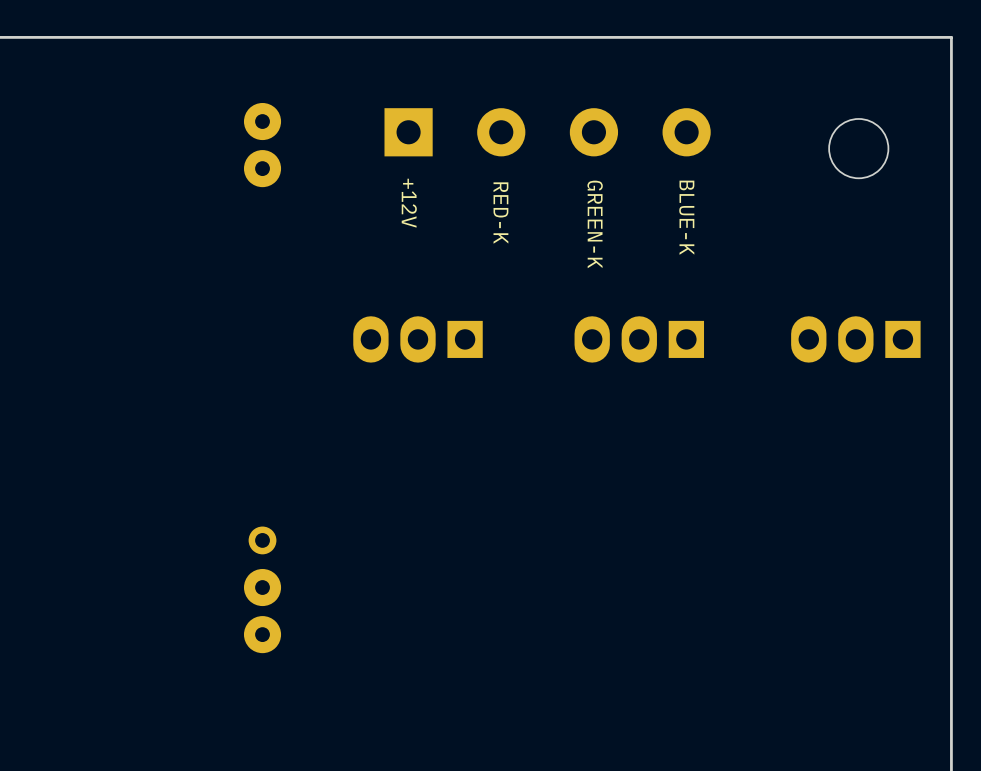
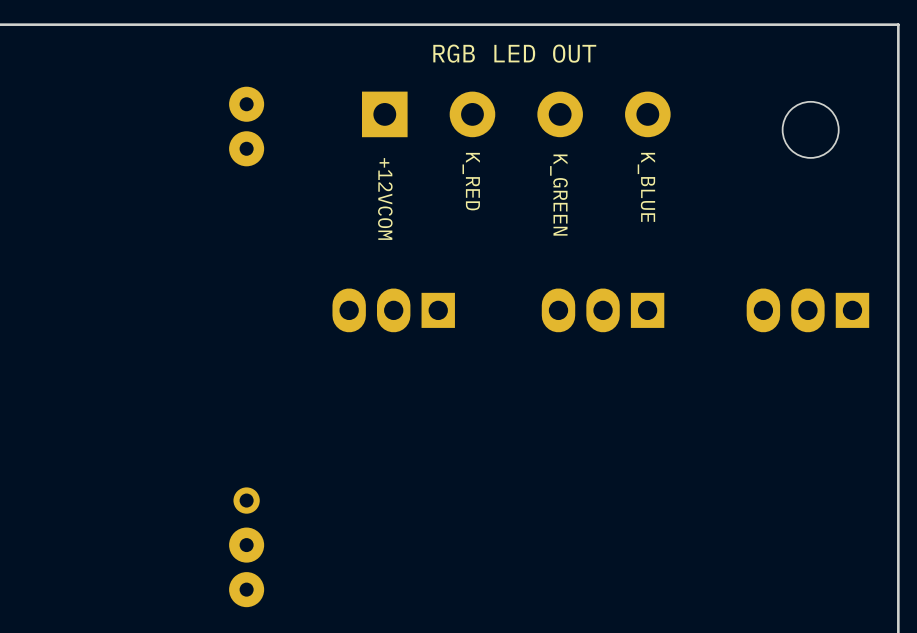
text: none -> RGB LED OUT (514, 53)
text: +12V (409, 203) -> +12VCOM (385, 198)
text: RED-K (500, 213) -> K_RED (471, 181)
text: BLUE-K (686, 217) -> K_BLUE (646, 187)
text: GREEN-K (595, 224) -> K_GREEN (558, 195)

